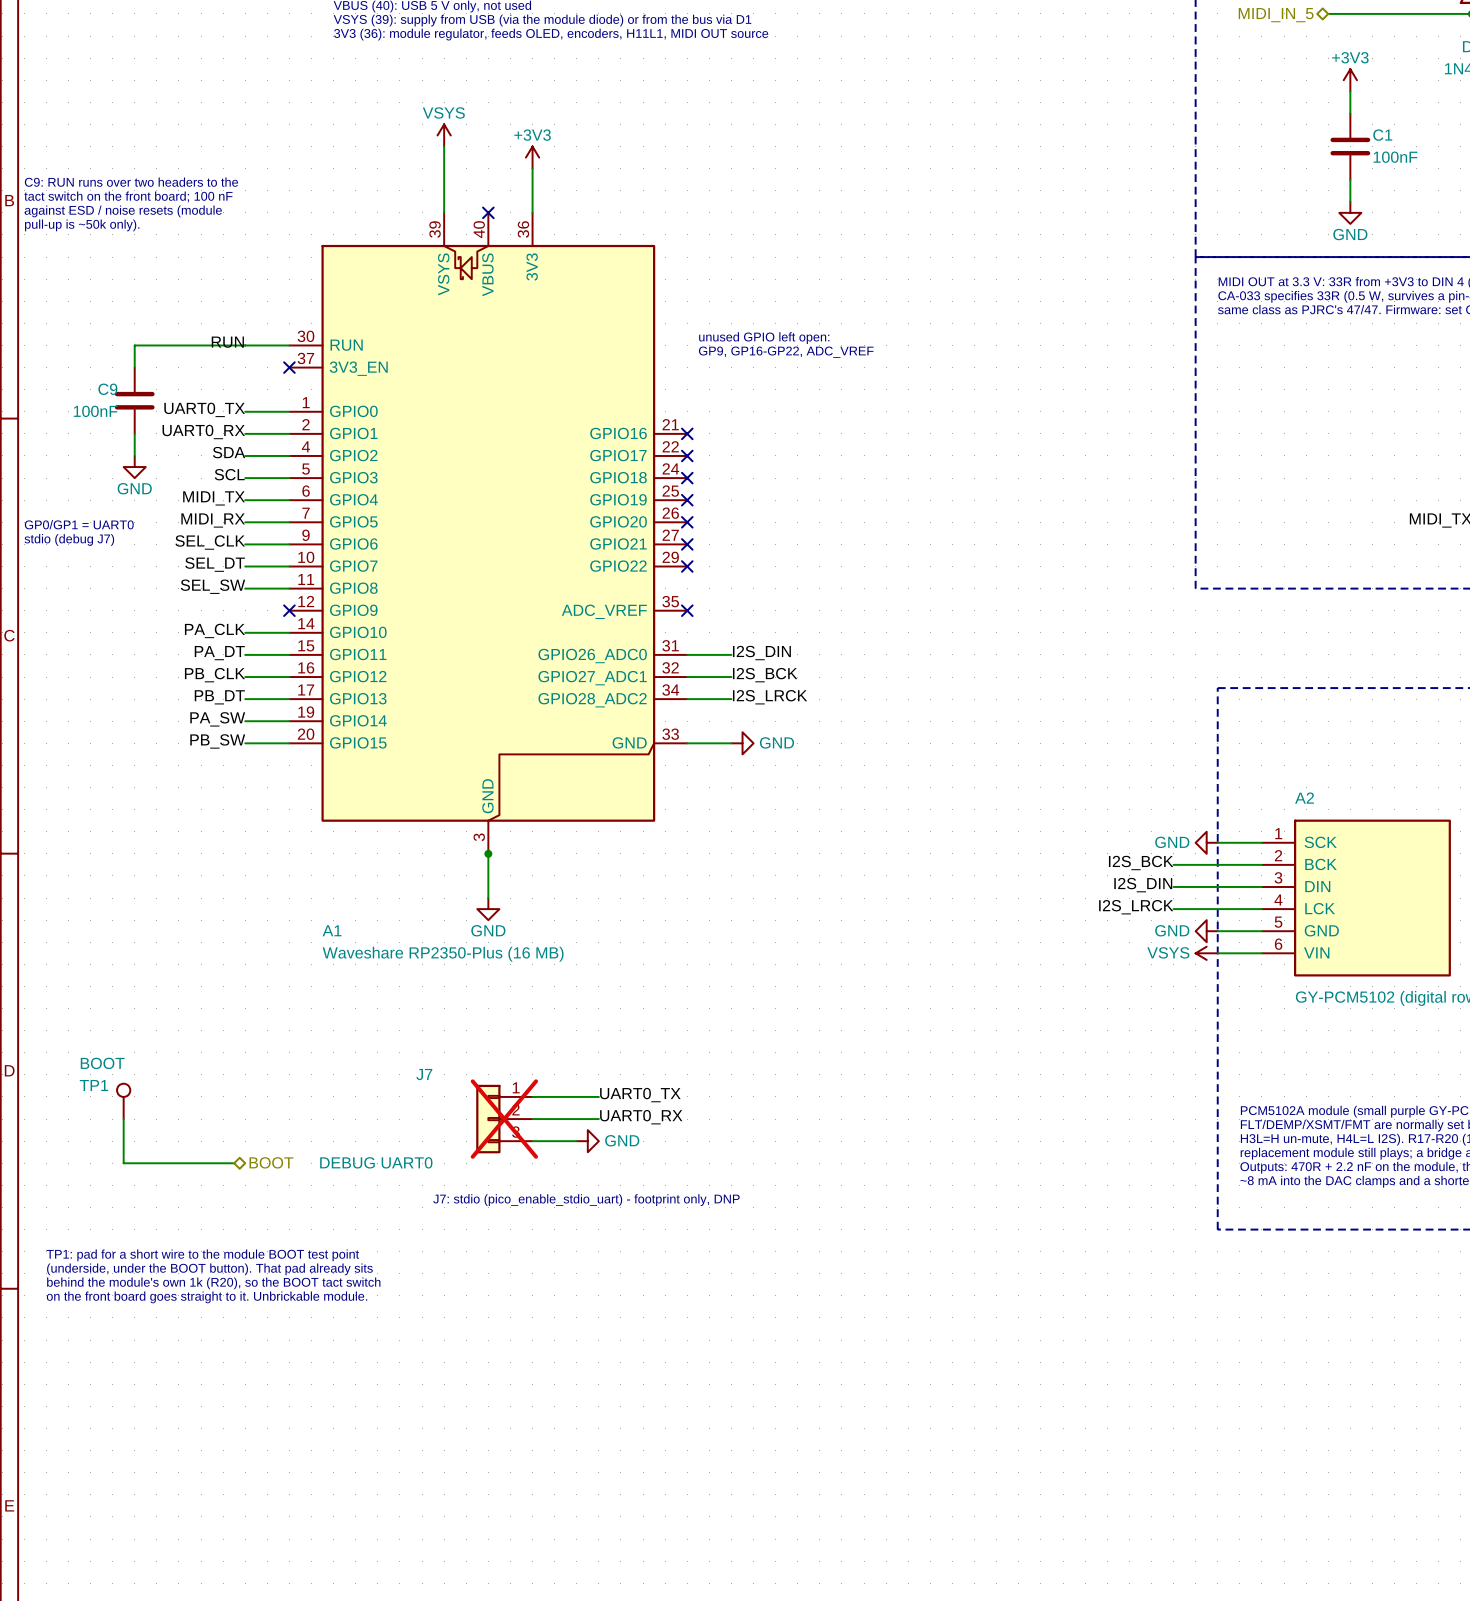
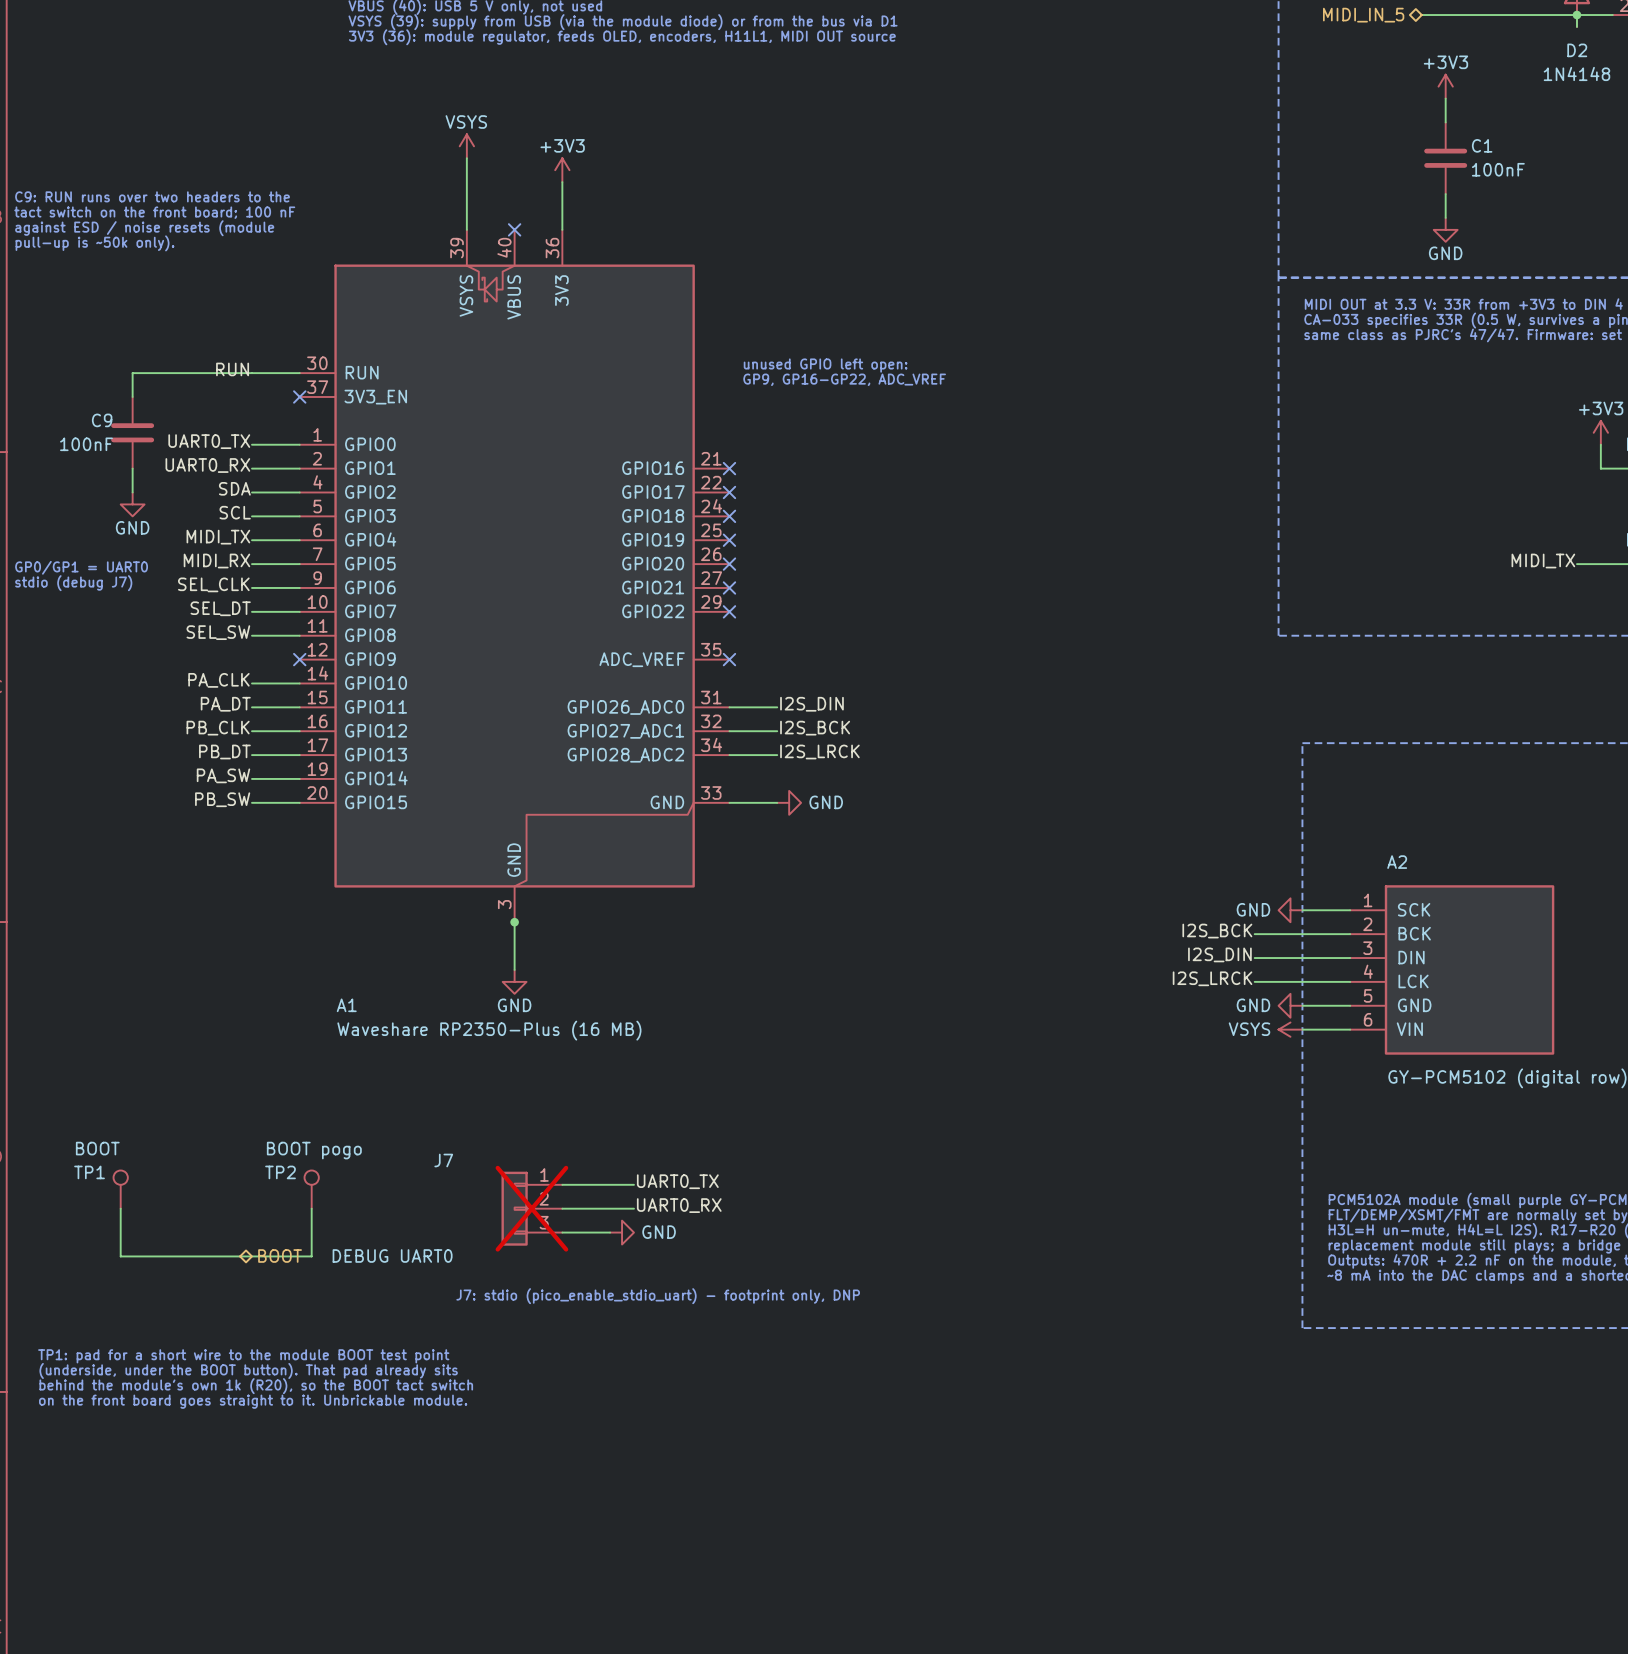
TP2: none -> BOOT pogo (311, 1189)
wire: none -> (311, 1208) (311, 1256) (240, 1256)

